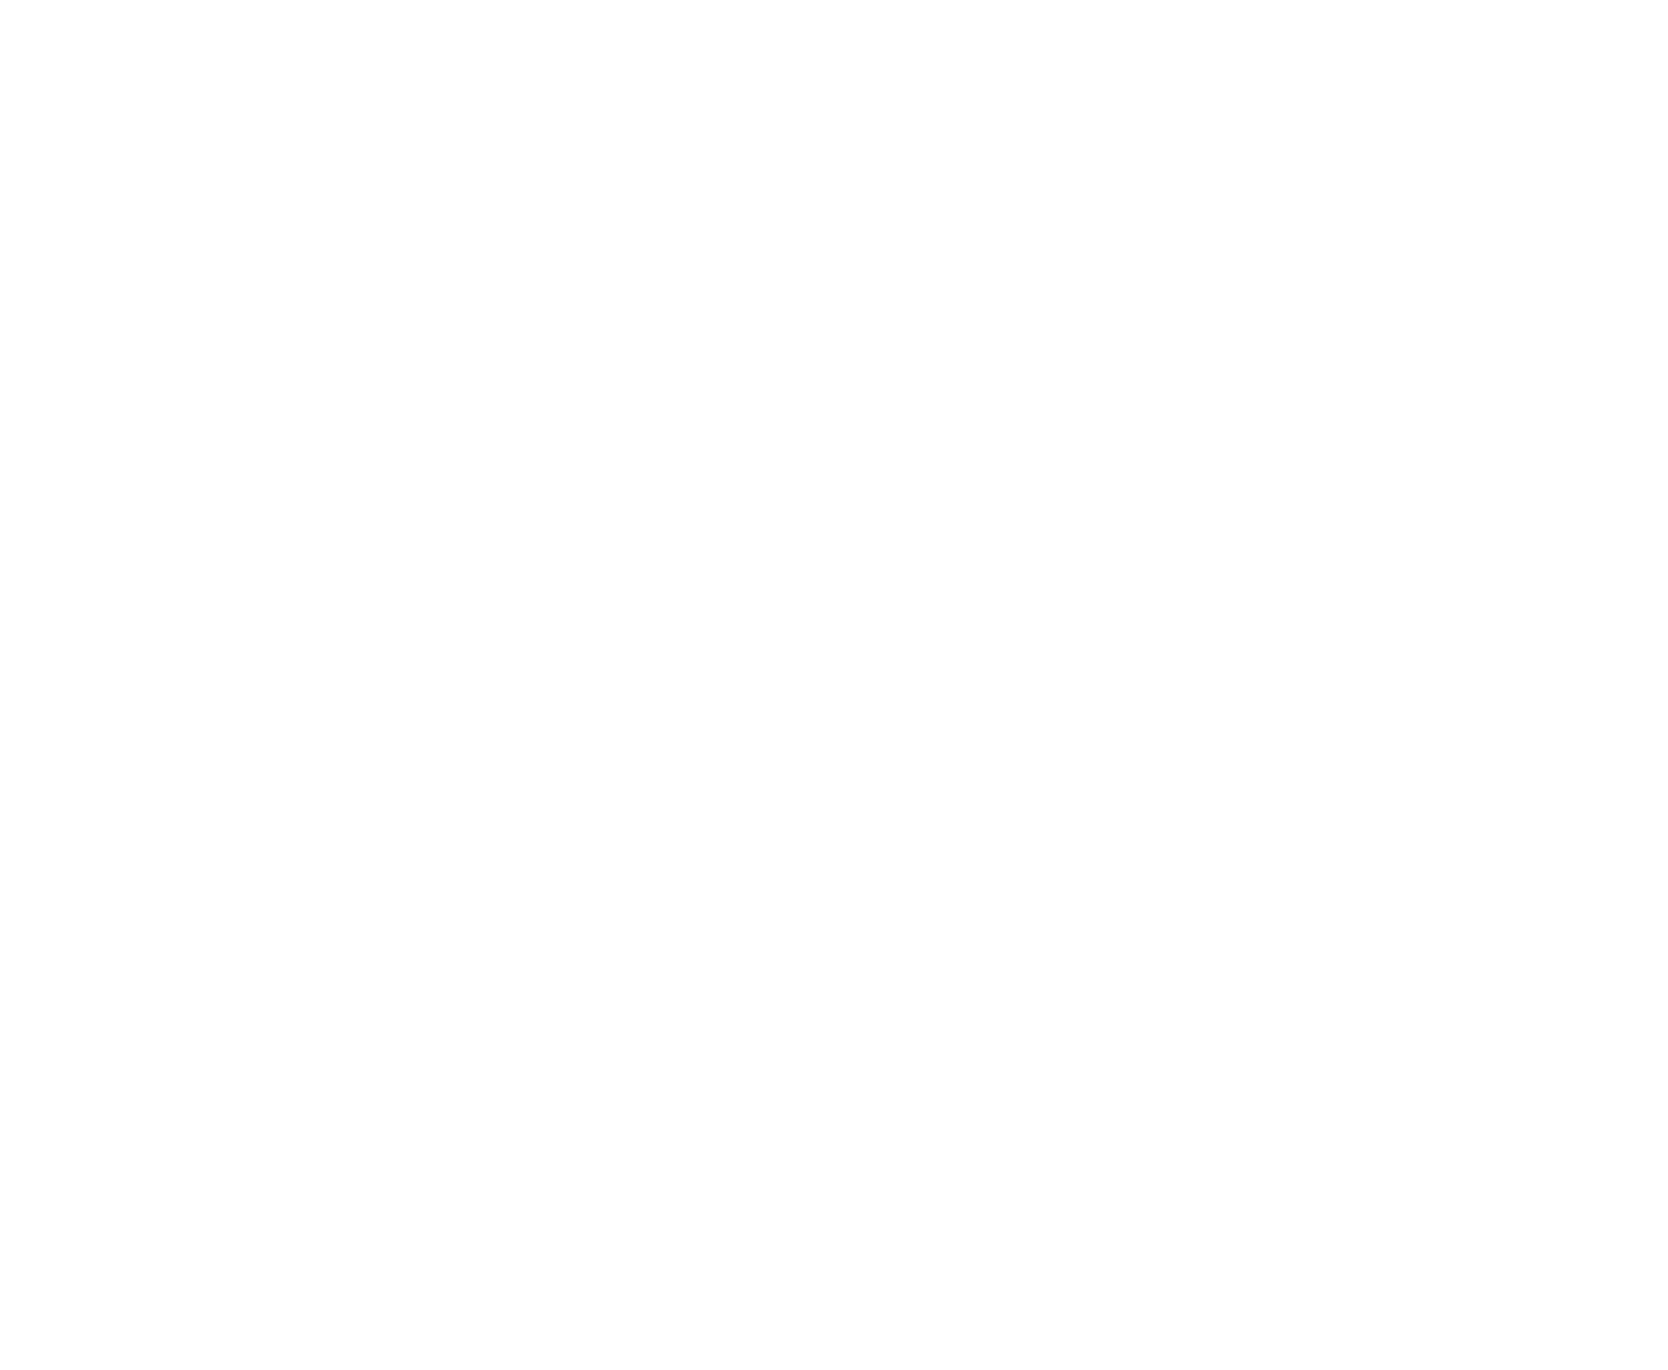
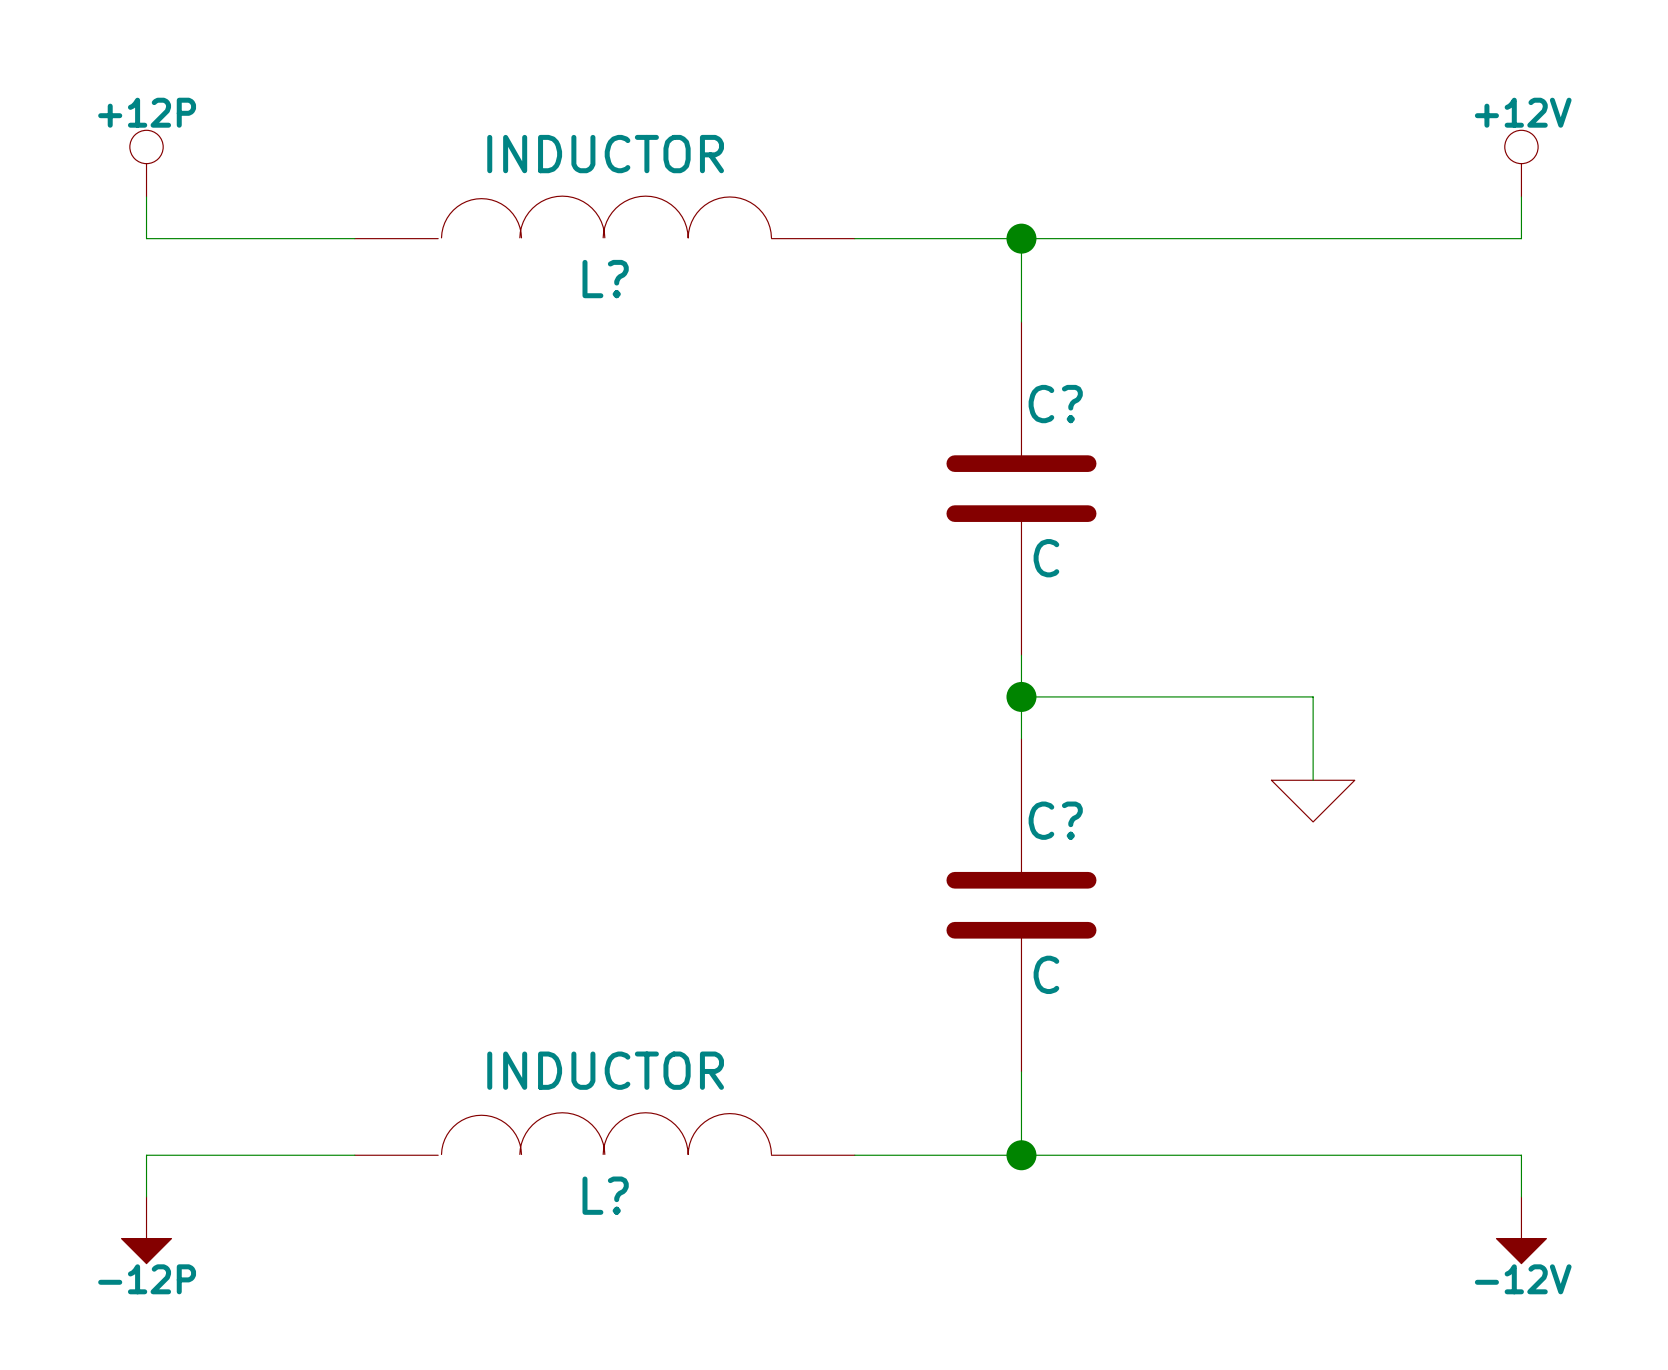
power symbol: none -> +12P (146, 163)
power symbol: none -> +12V (1521, 163)
wire: none -> (146, 196) (146, 238) (354, 238)
wire: none -> (1521, 196) (1521, 238) (854, 238)
L?: none -> INDUCTOR (604, 217)
wire: none -> (1021, 238) (1021, 321)
junction: none -> (1021, 238)
C?: none -> C (1021, 488)
wire: none -> (1021, 655) (1021, 738)
wire: none -> (1021, 696) (1313, 696) (1313, 780)
junction: none -> (1021, 696)
power symbol: none -> (1313, 801)
C?: none -> C (1021, 905)
wire: none -> (1021, 1071) (1021, 1155)
L?: none -> INDUCTOR (604, 1134)
wire: none -> (354, 1155) (146, 1155) (146, 1196)
wire: none -> (854, 1155) (1521, 1155) (1521, 1196)
junction: none -> (1021, 1155)
power symbol: none -> -12P (146, 1230)
power symbol: none -> -12V (1521, 1230)

